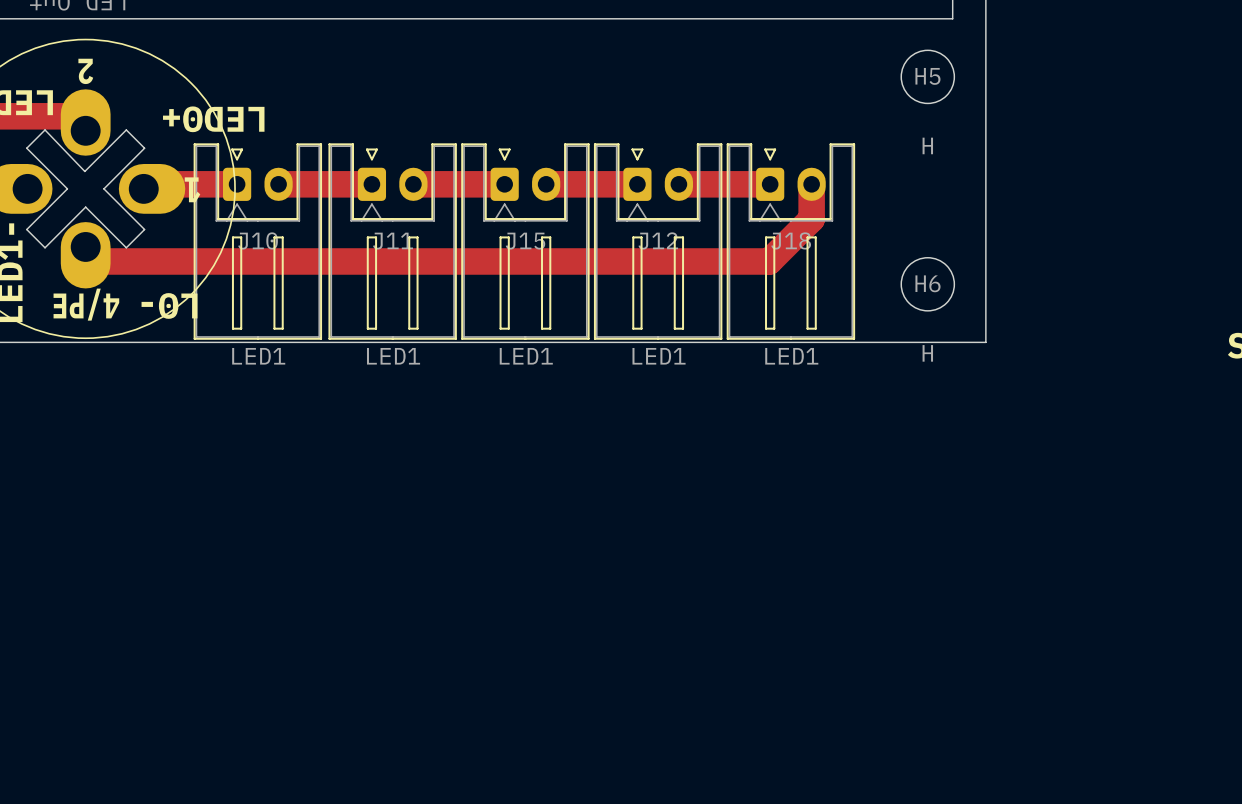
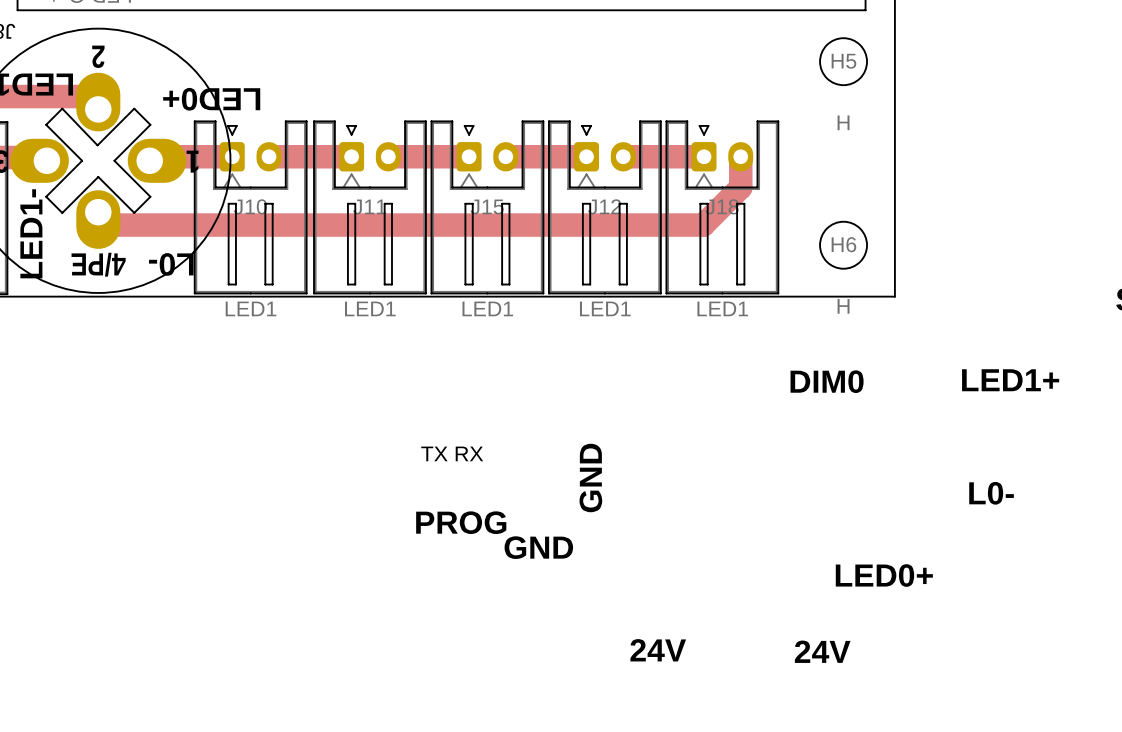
text: none -> LED1+ (1010, 380)
text: none -> DIM0 (827, 381)
text: none -> TX RX (452, 453)
text: none -> GND (590, 478)
text: none -> L0- (991, 493)
text: none -> PROG (461, 522)
text: none -> GND (538, 547)
text: none -> LED0+ (884, 575)
text: none -> 24V (658, 650)
text: none -> 24V (822, 651)

